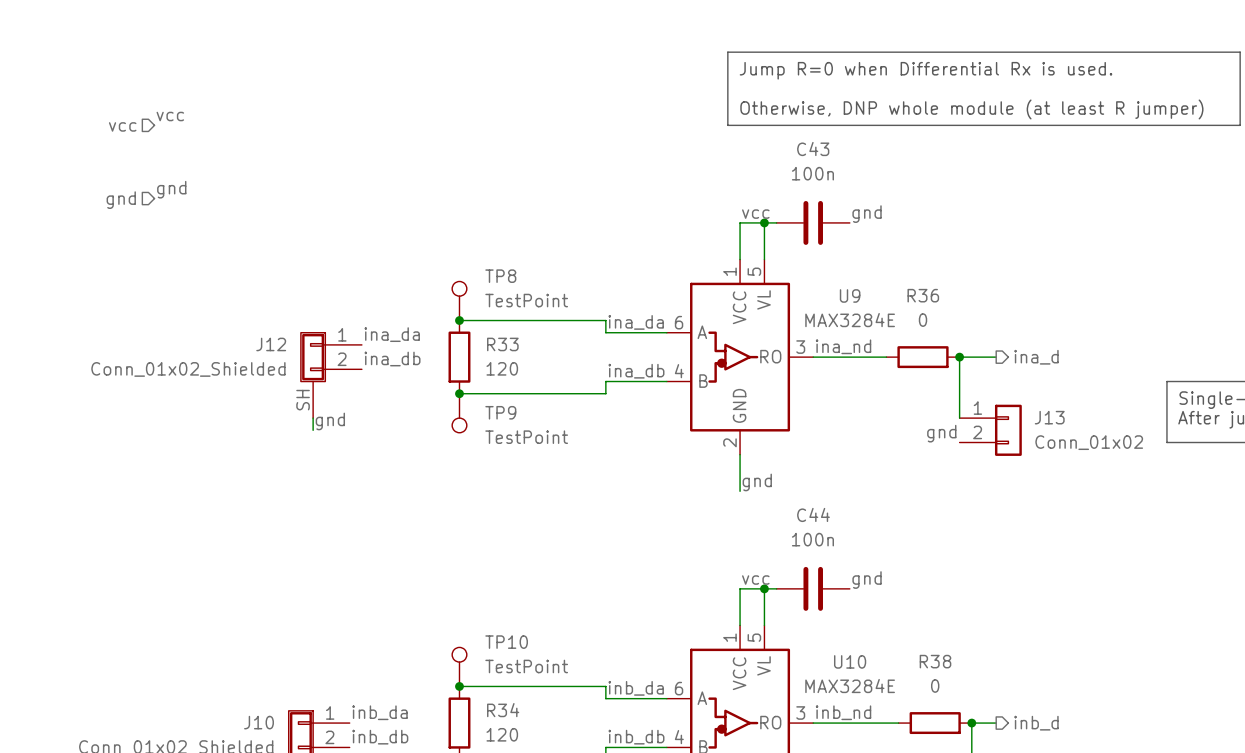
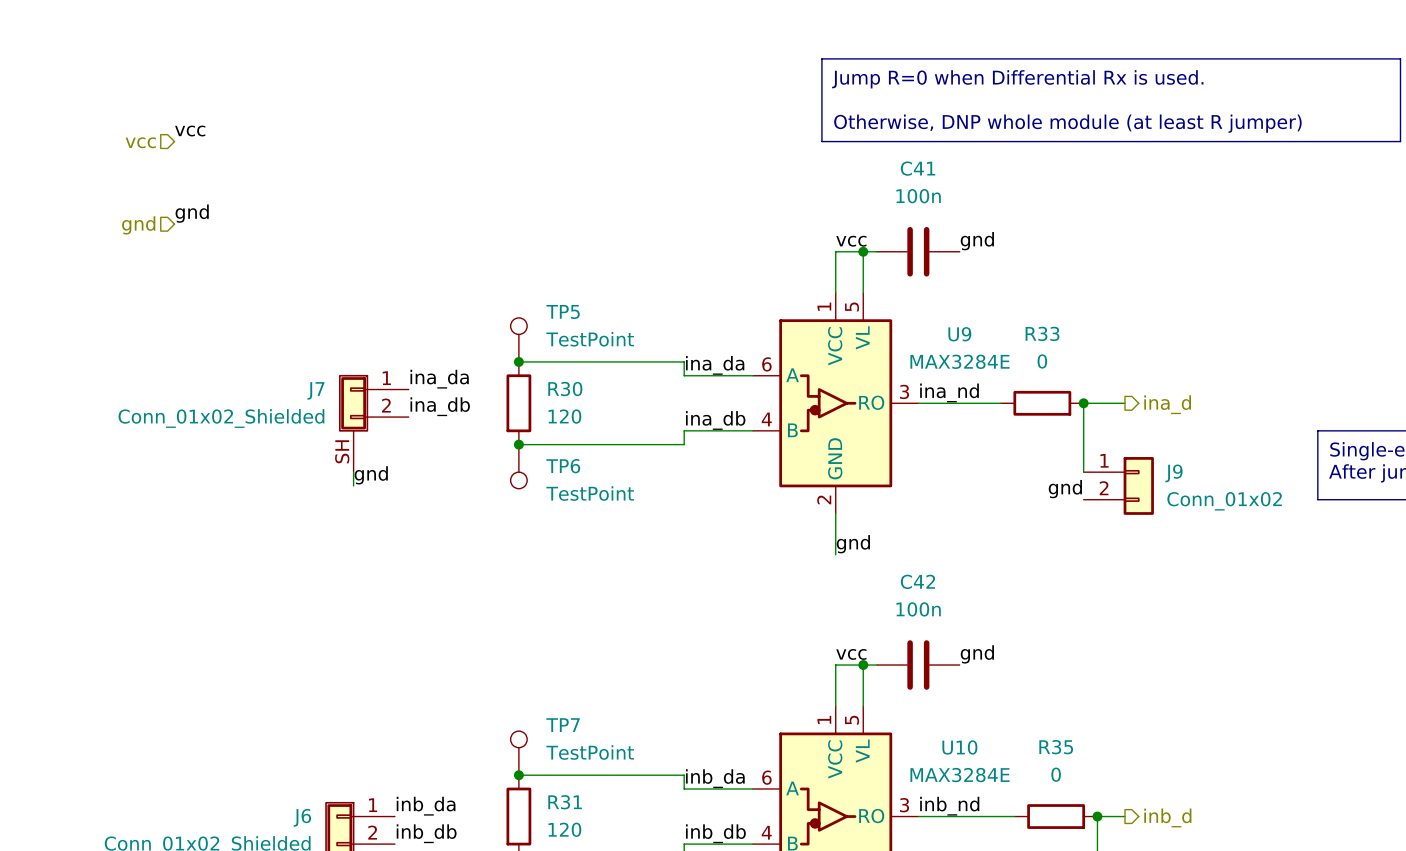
C43 name: C43 (813, 149) -> C41 (918, 168)
TP8 name: TP8 (500, 276) -> TP5 (563, 312)
R36 name: R36 (923, 295) -> R33 (1042, 333)
J12 name: J12 (271, 344) -> J7 (315, 390)
R33 name: R33 (502, 344) -> R30 (565, 389)
TP9 name: TP9 (500, 412) -> TP6 (563, 466)
J13 name: J13 (1049, 417) -> J9 (1173, 473)
C44 name: C44 (813, 514) -> C42 (917, 581)
TP10 name: TP10 (506, 642) -> TP7 (563, 725)
R38 name: R38 (935, 661) -> R35 (1056, 747)
R34 name: R34 (503, 710) -> R31 (565, 802)
J10 name: J10 (259, 722) -> J6 (302, 817)

